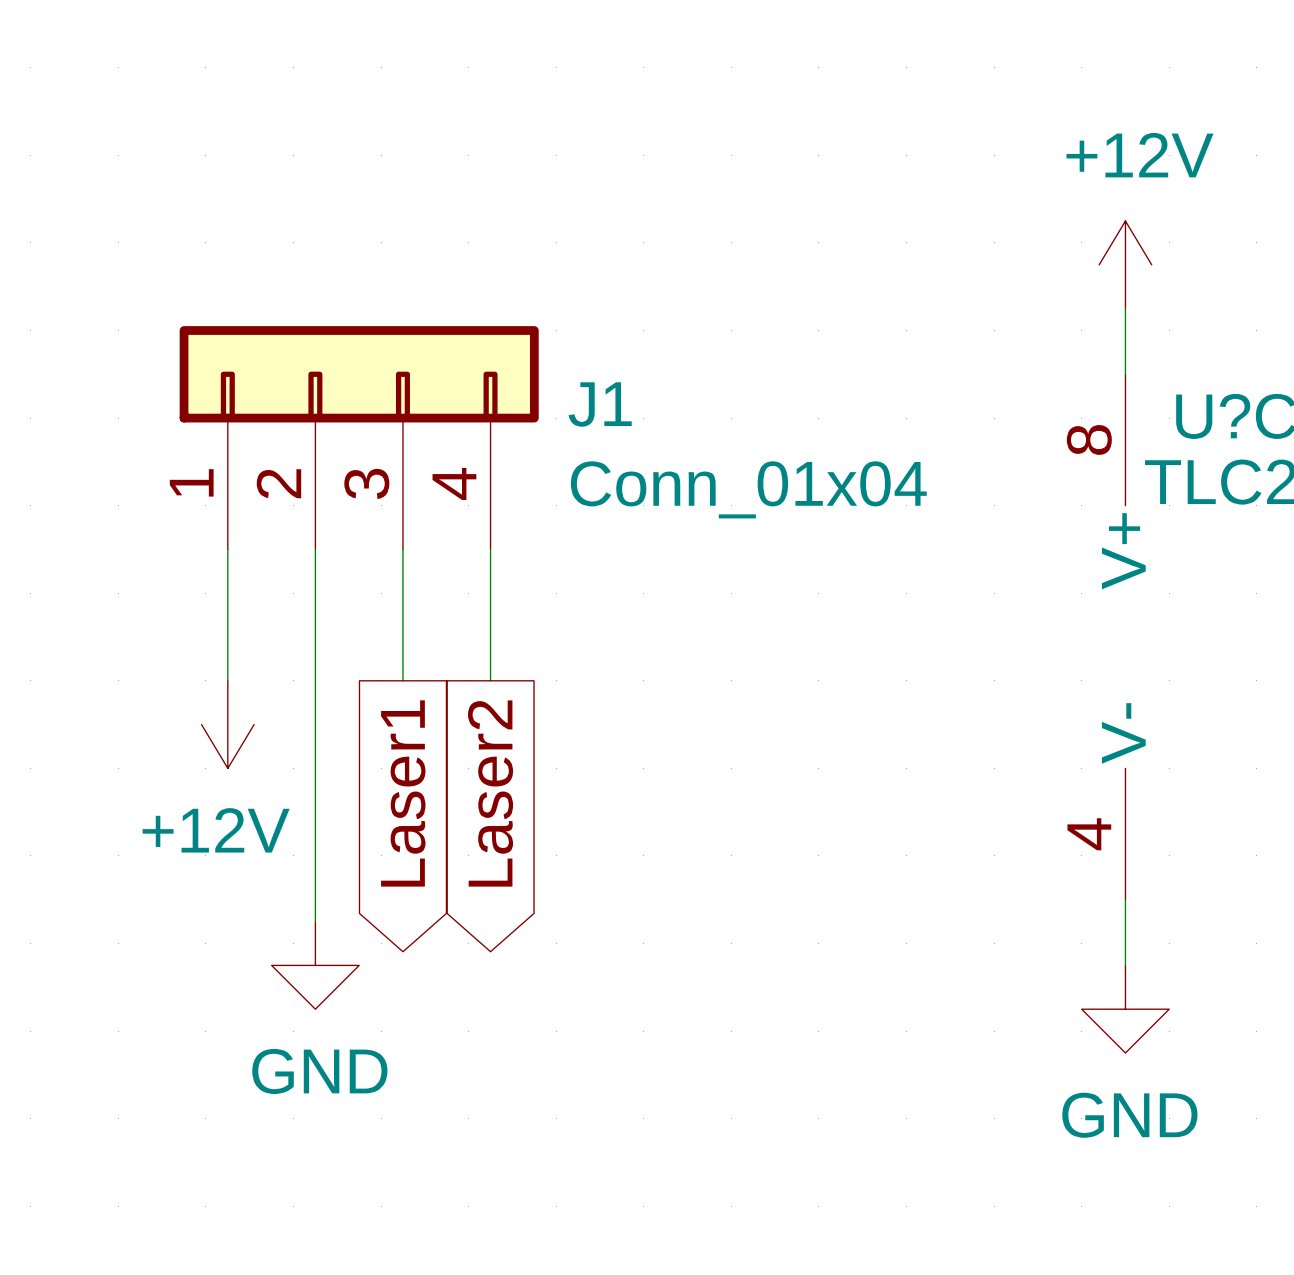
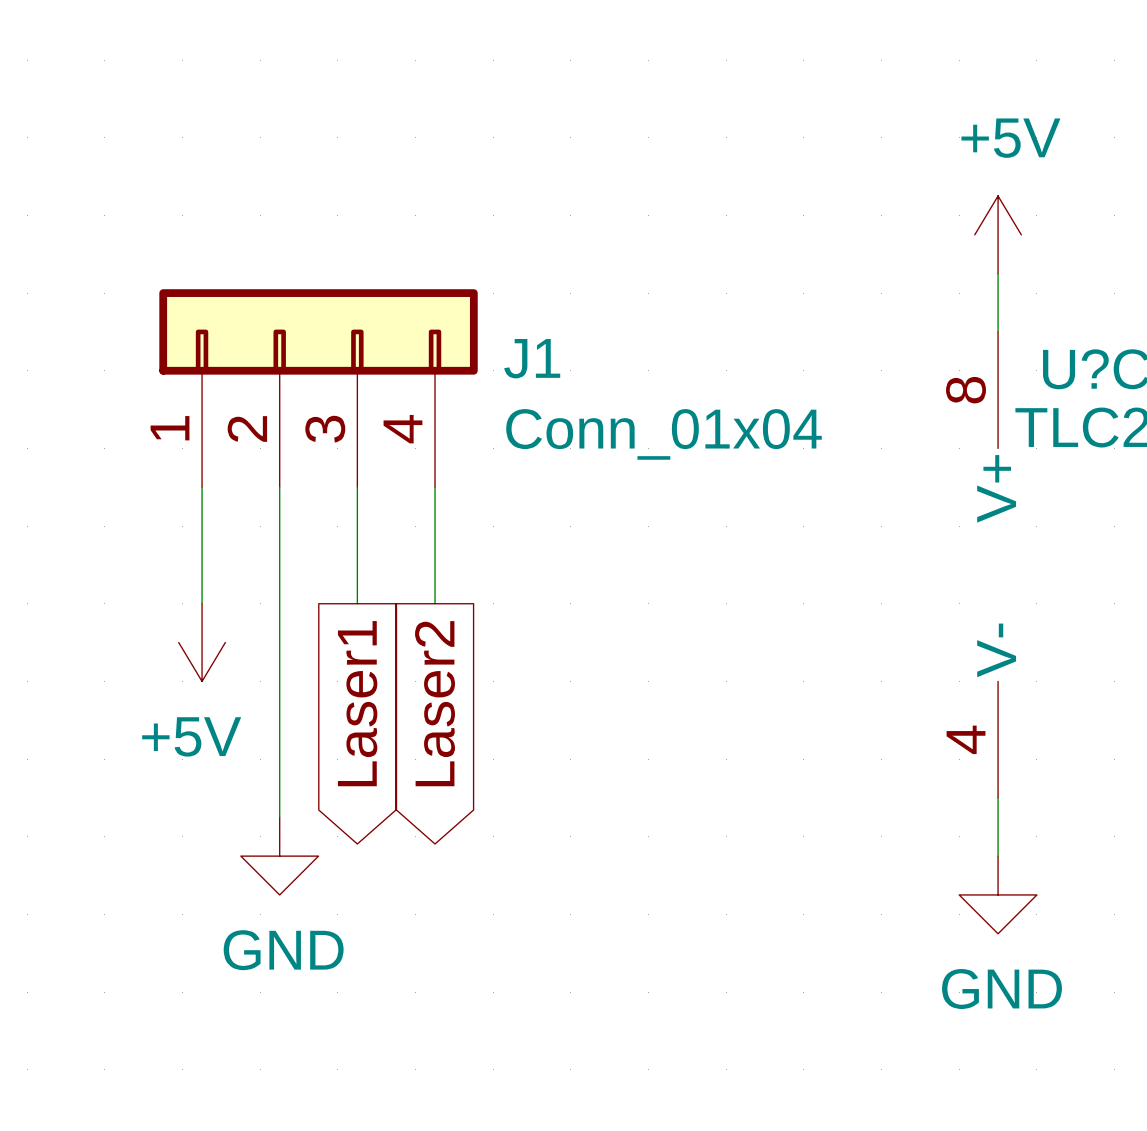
power symbol: +12V (1125, 264) -> +5V (998, 234)
power symbol: +12V (227, 724) -> +5V (202, 642)

